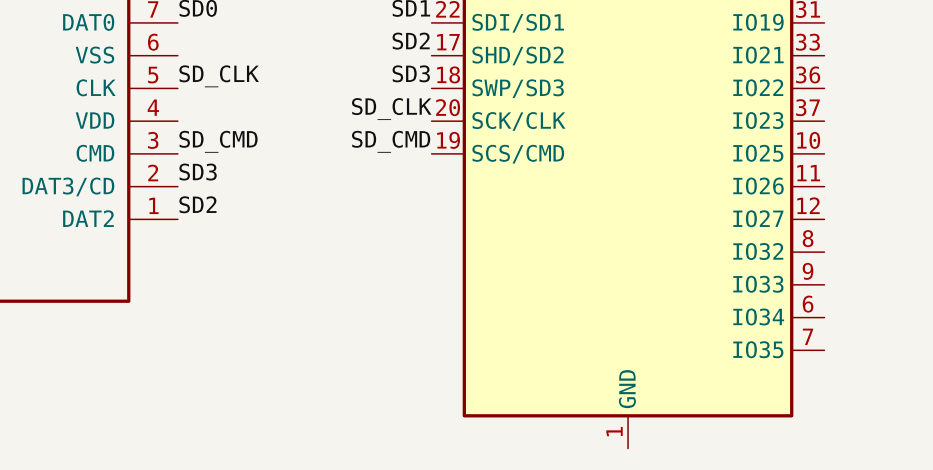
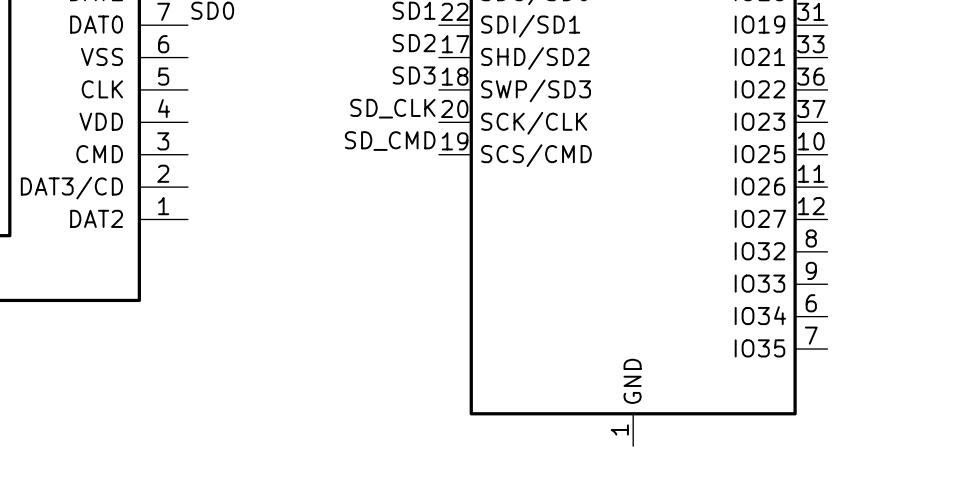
label: SD_CLK (219, 76) -> none
label: SD_CMD (218, 141) -> none
label: SD3 (198, 172) -> none
label: SD2 (197, 204) -> none

